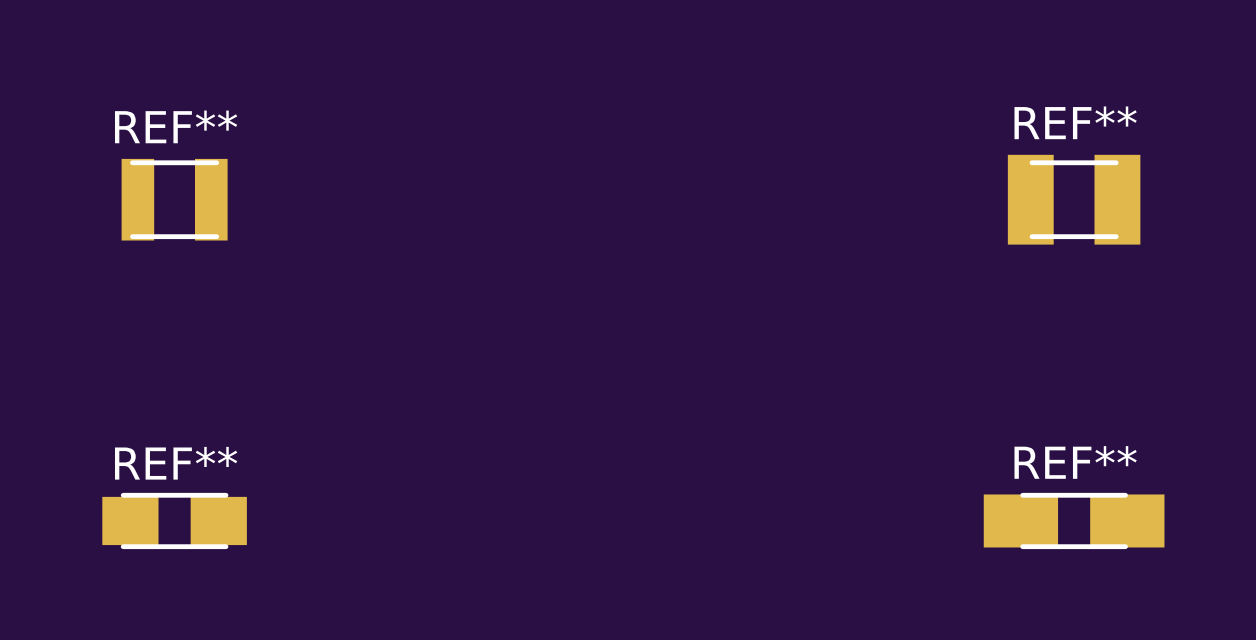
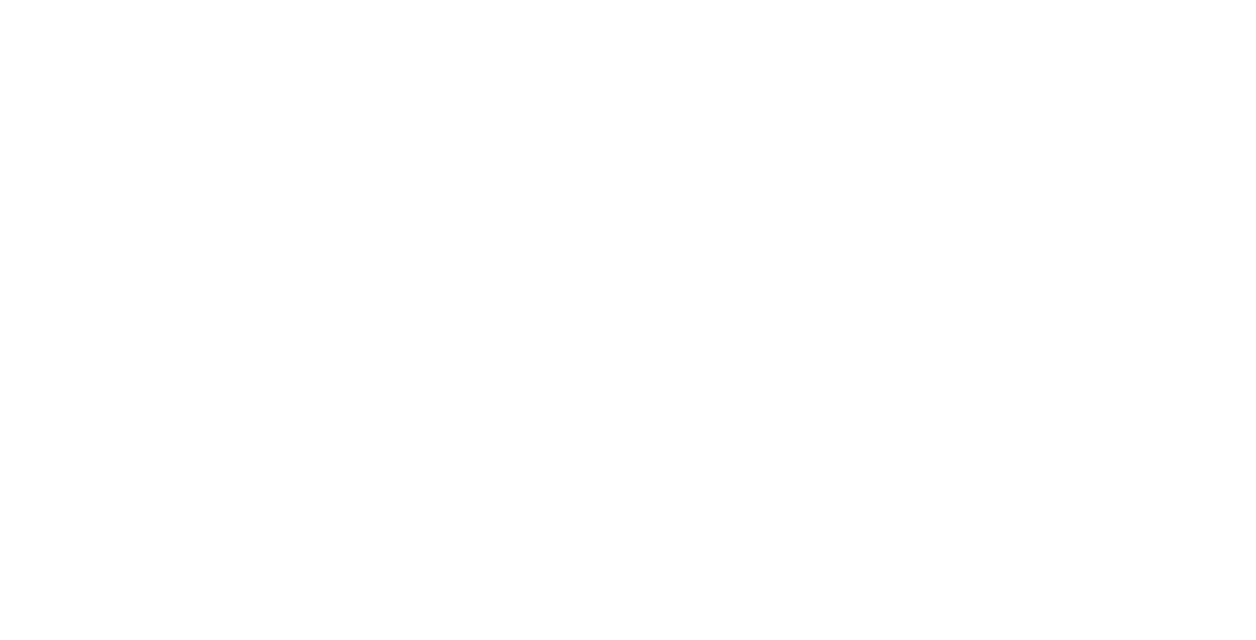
REF**: (174, 199) -> none
REF**: (1074, 199) -> none
REF**: (174, 520) -> none
REF**: (1074, 520) -> none

